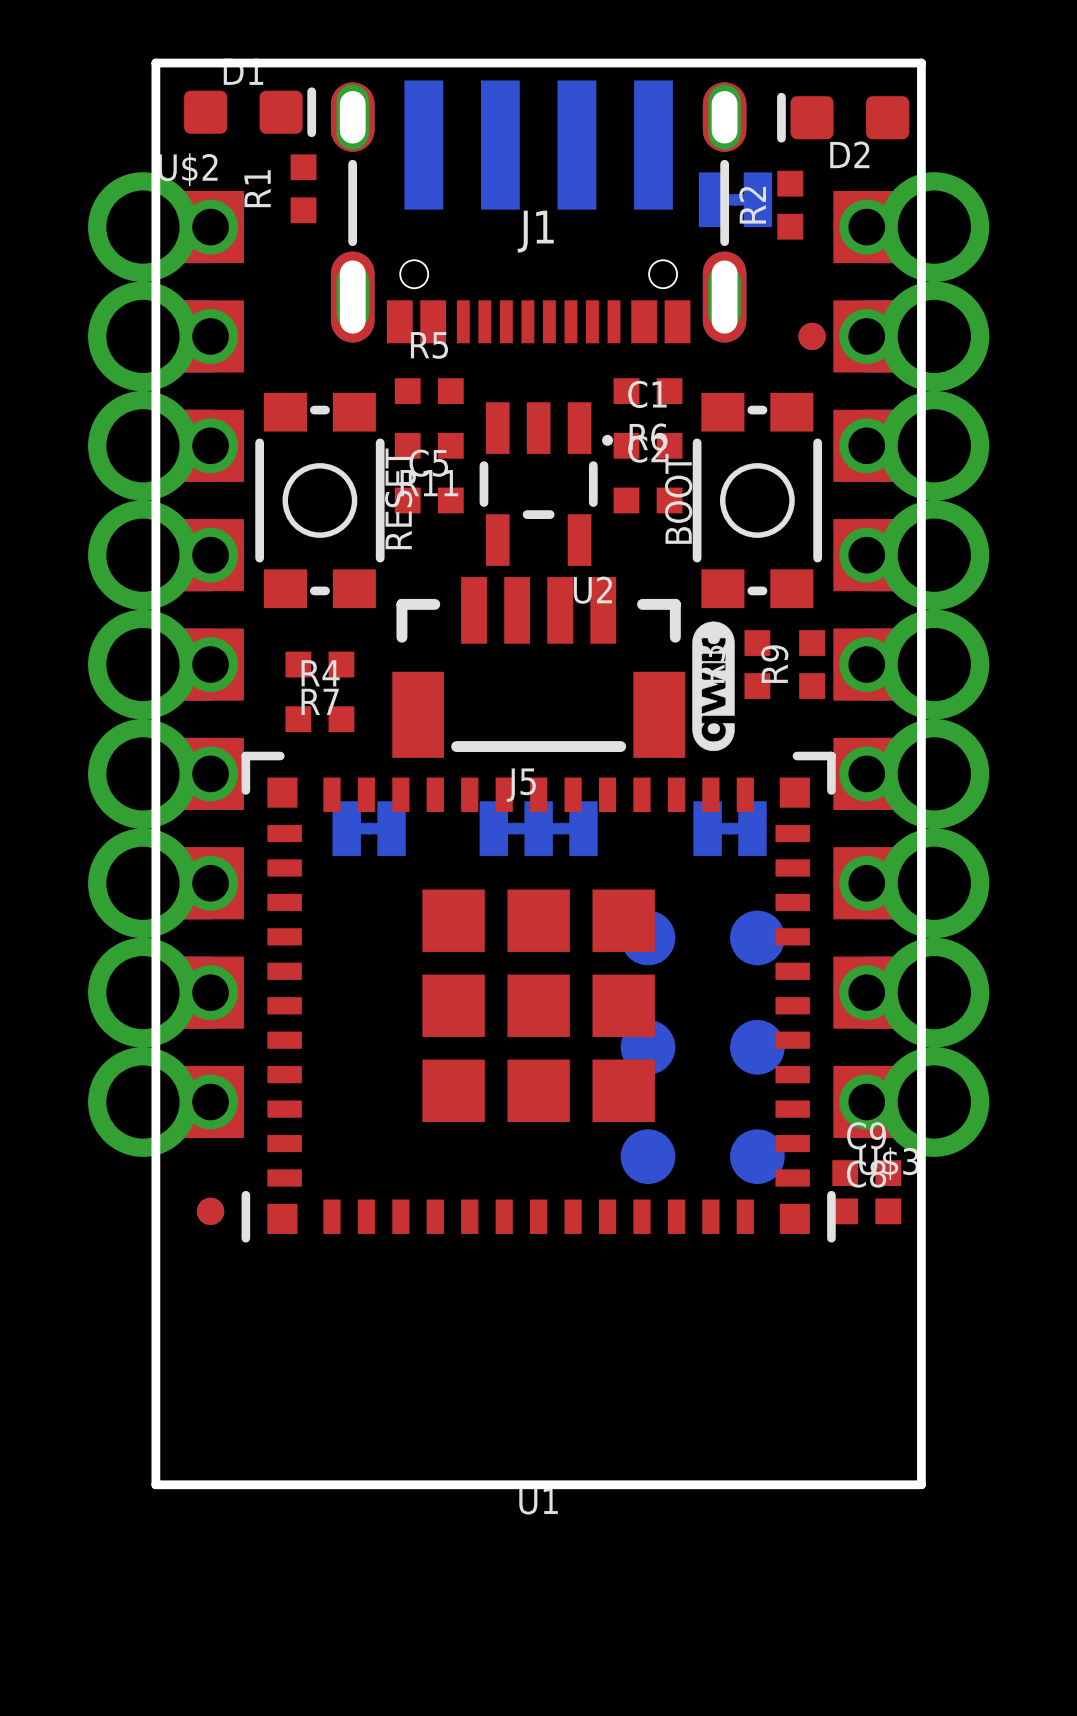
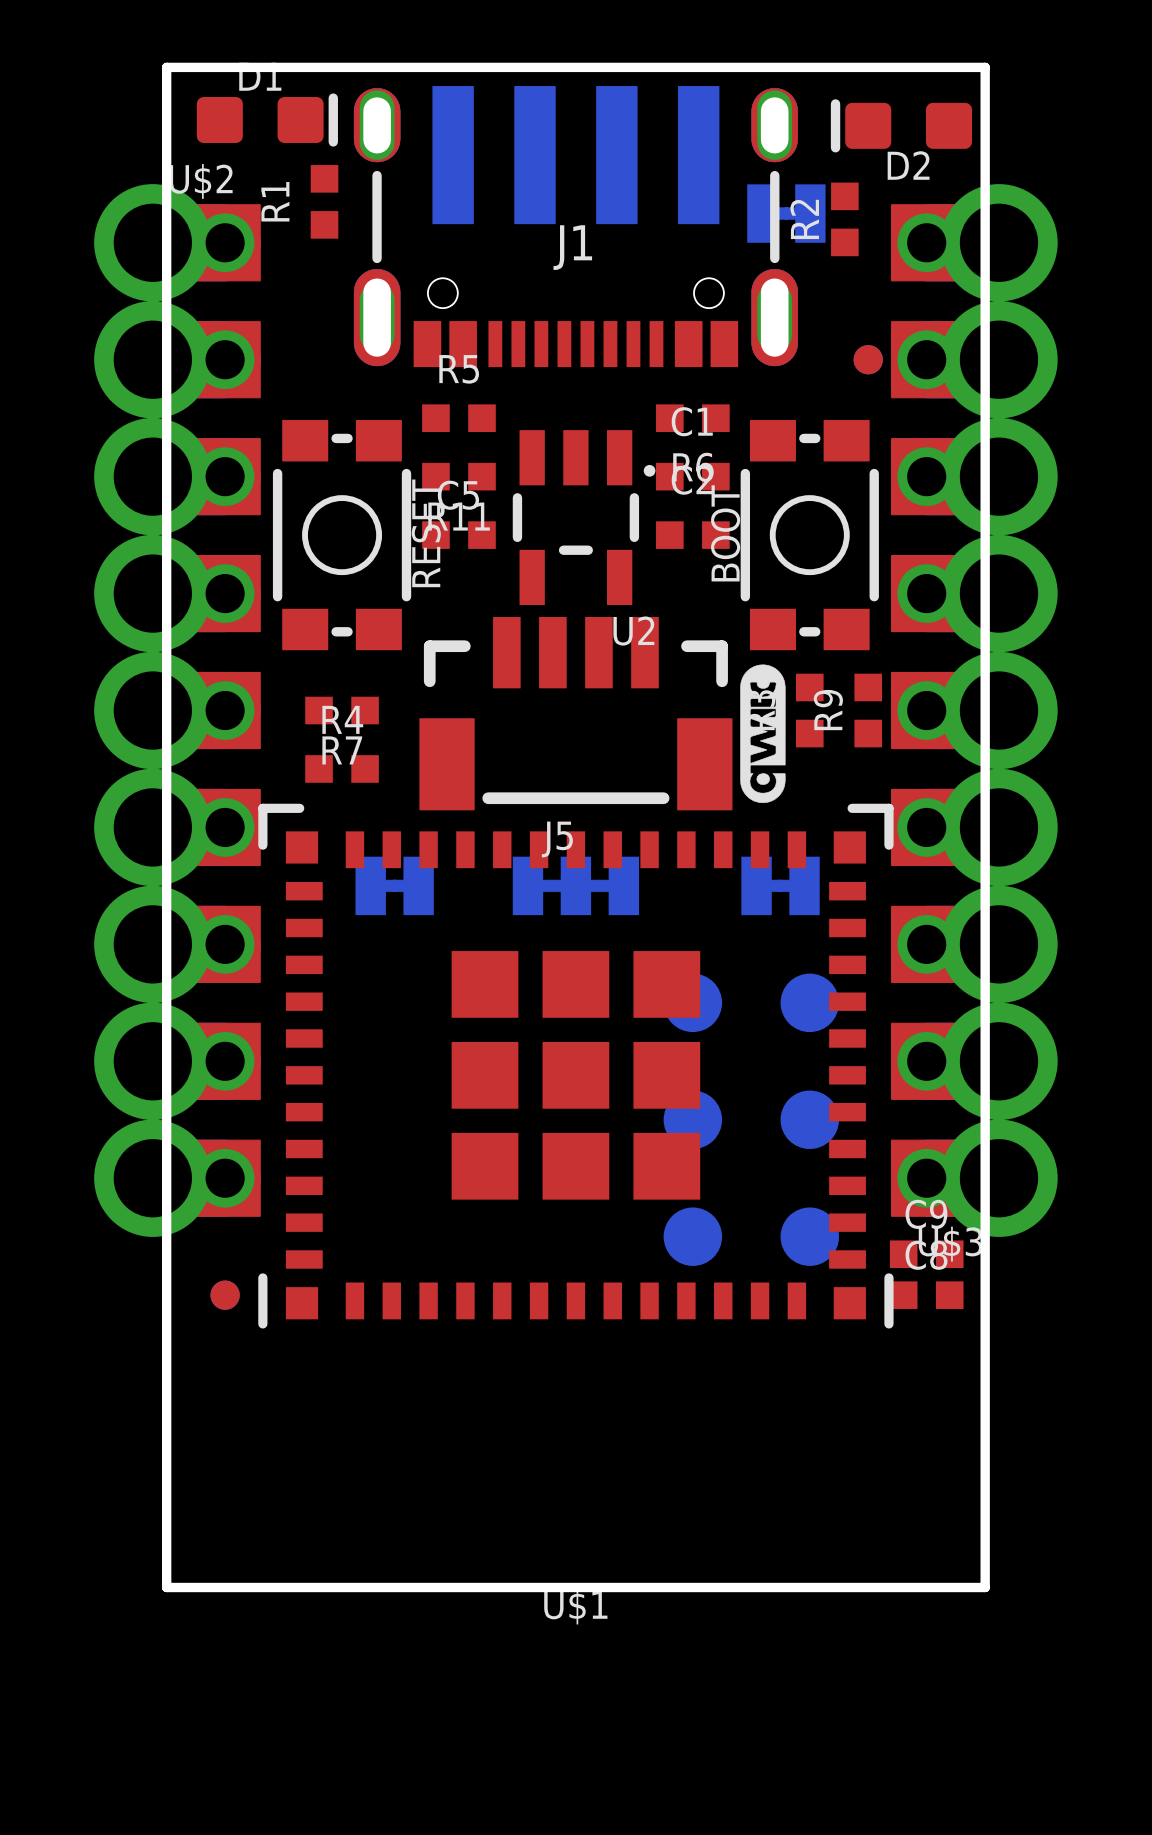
U1 name: U1 (538, 1501) -> U$1 (575, 1606)

